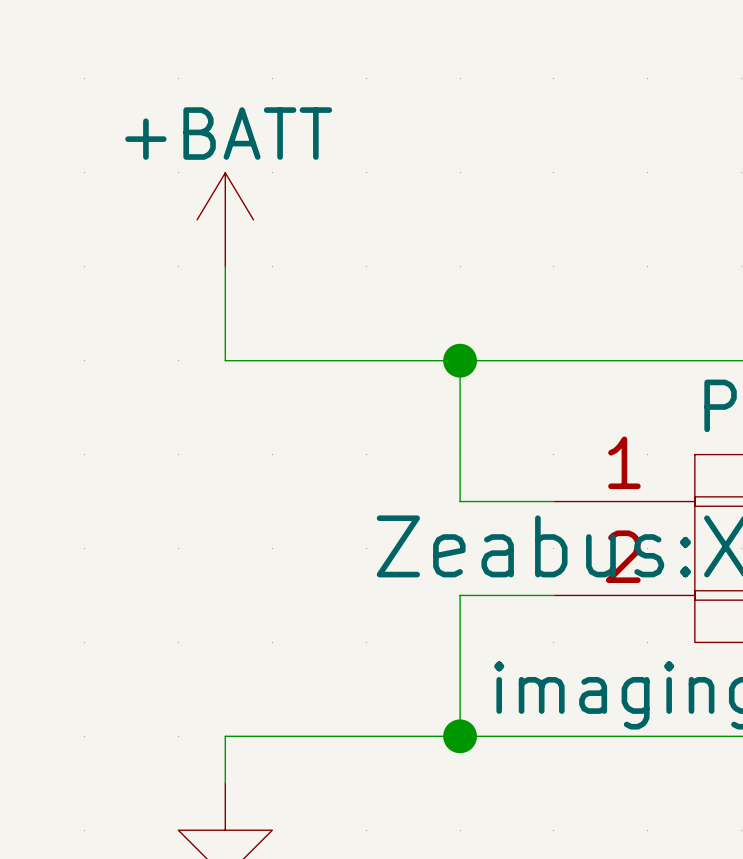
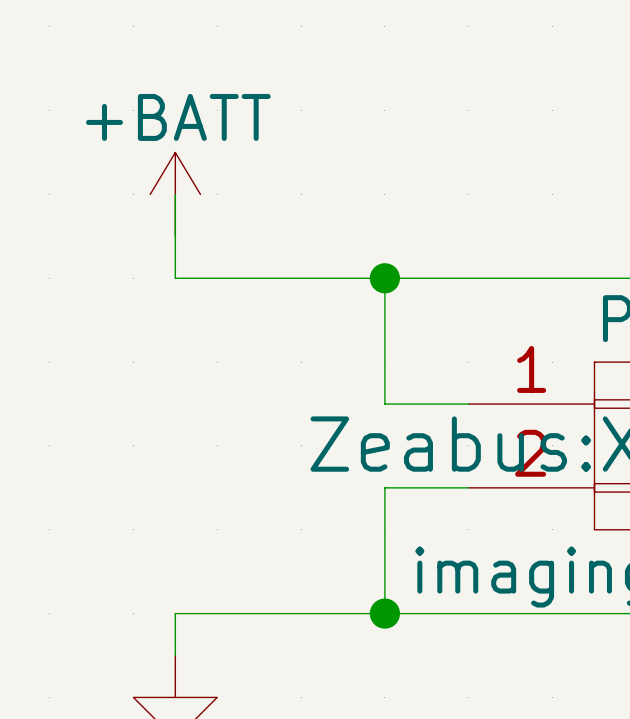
power symbol position: +BATT (225, 219) -> +BATT (175, 194)

